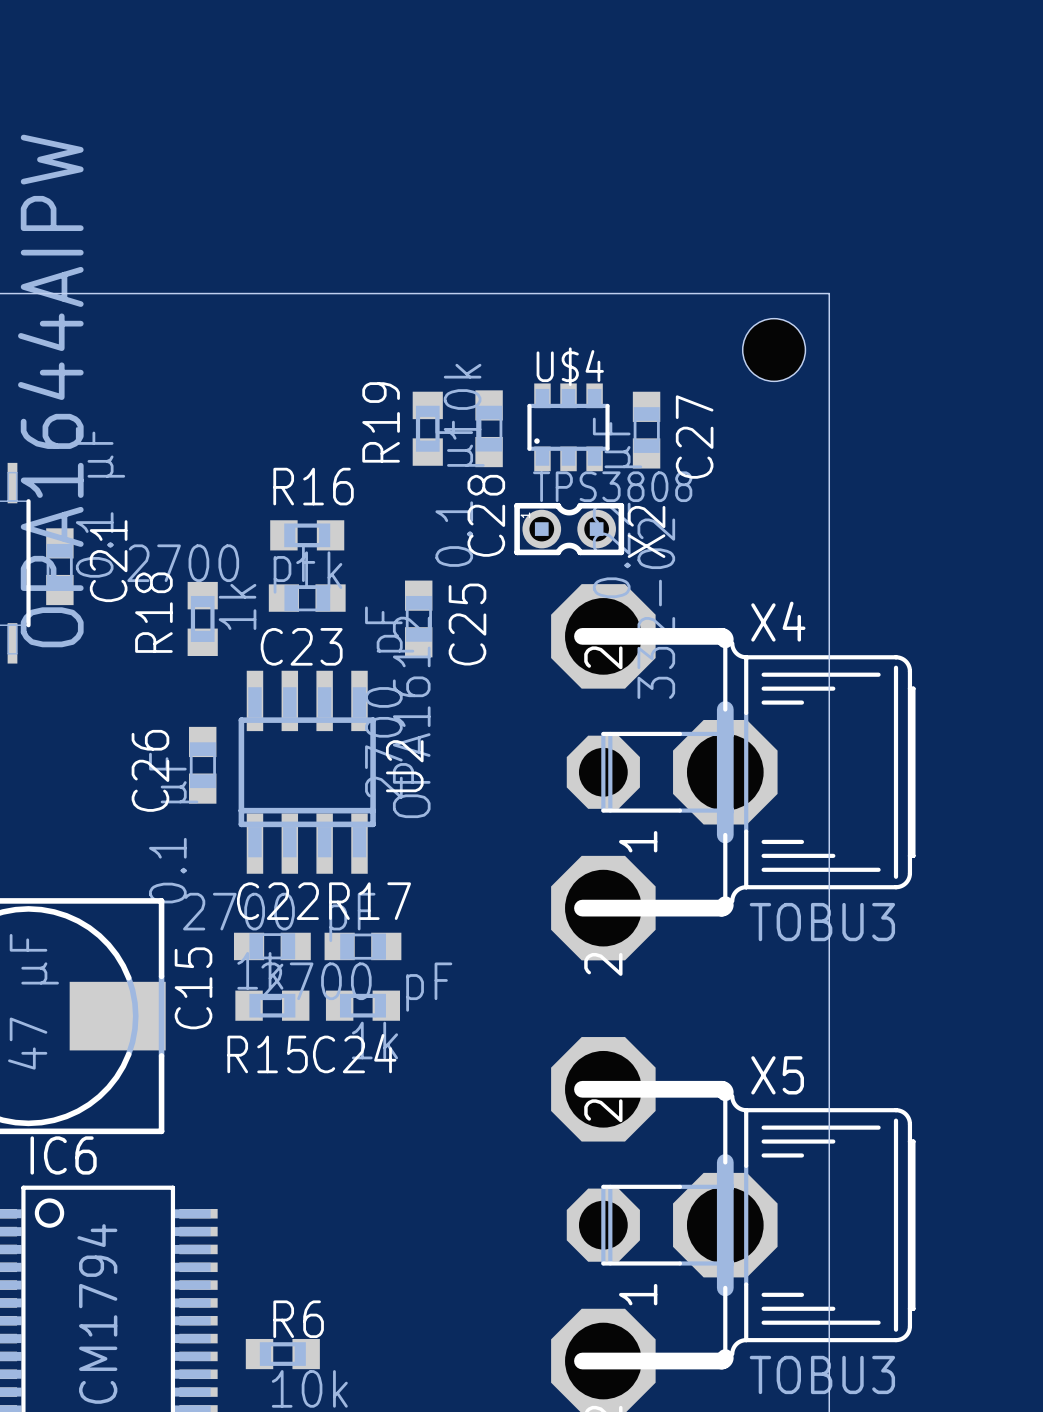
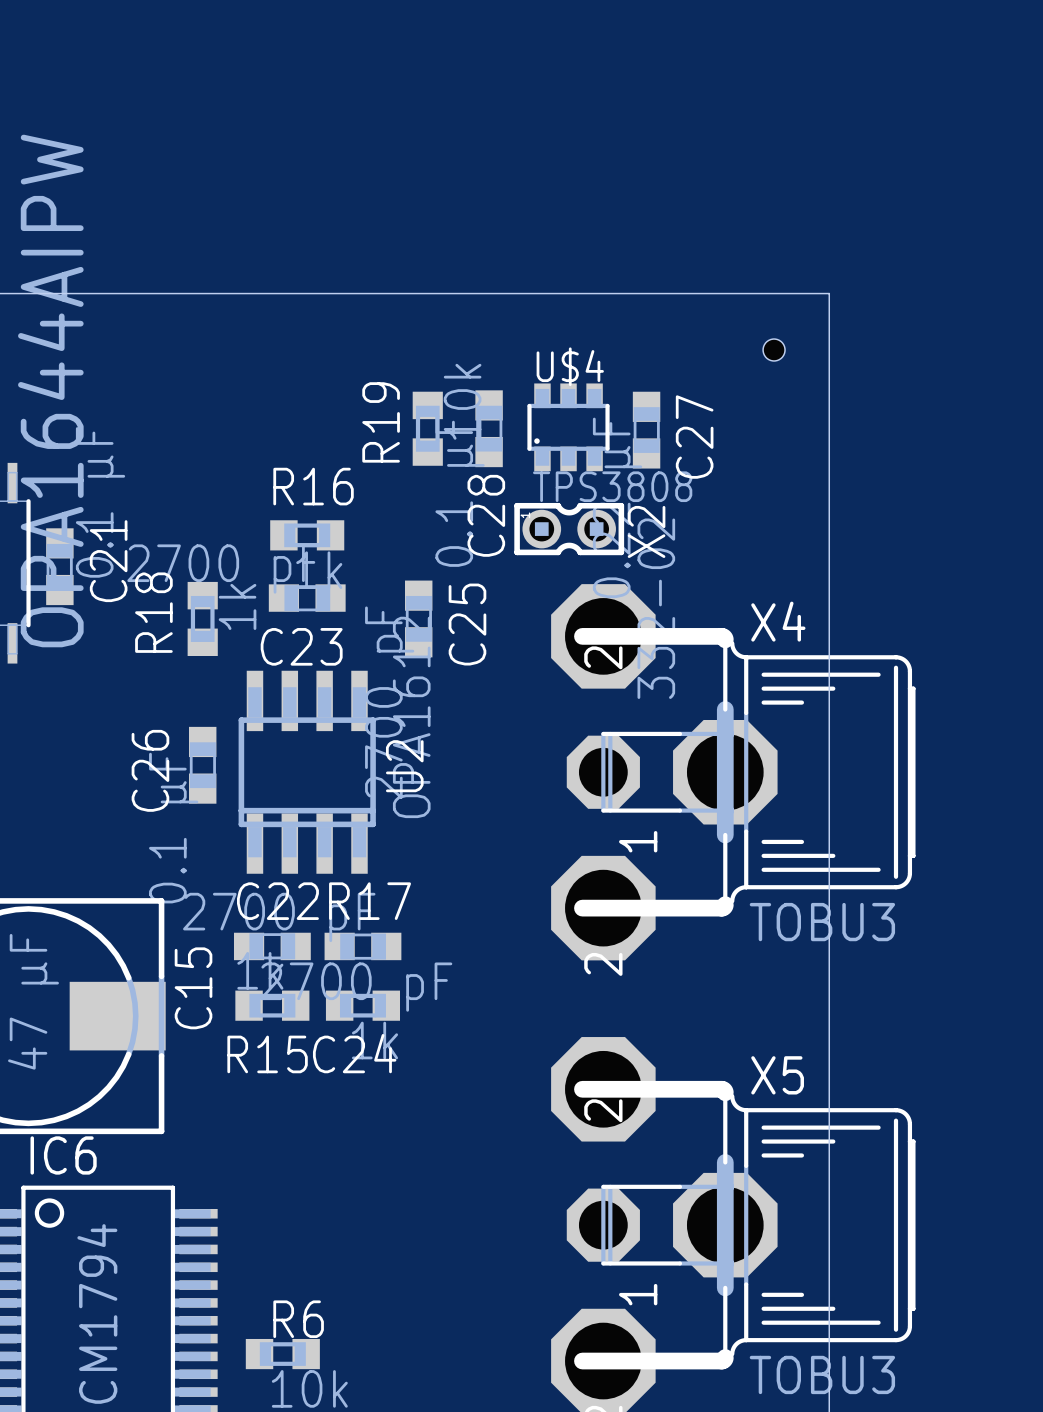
hole size: [742, 318, 806, 382] -> [763, 339, 786, 361]

